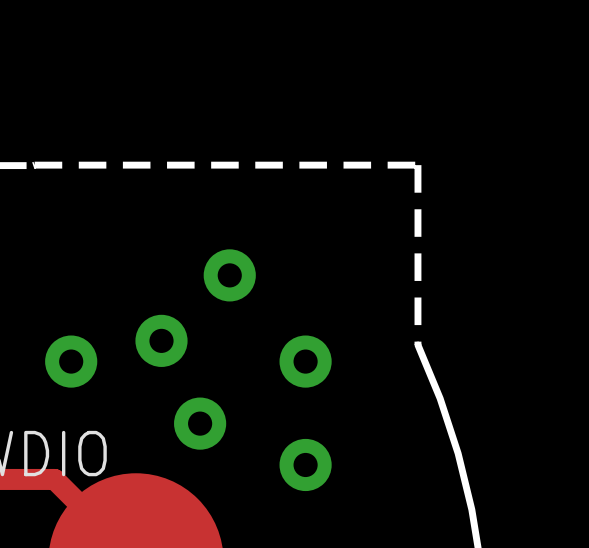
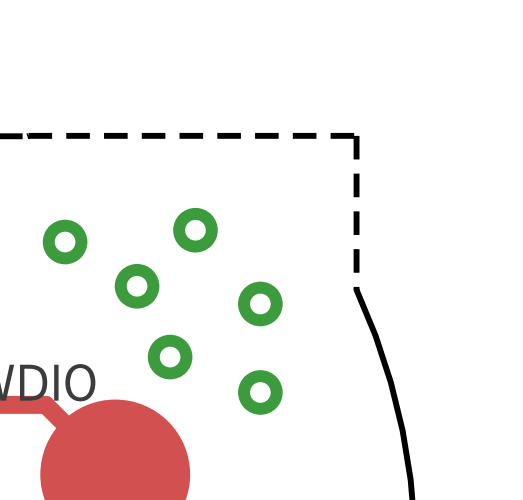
via position: (71, 361) -> (65, 242)

